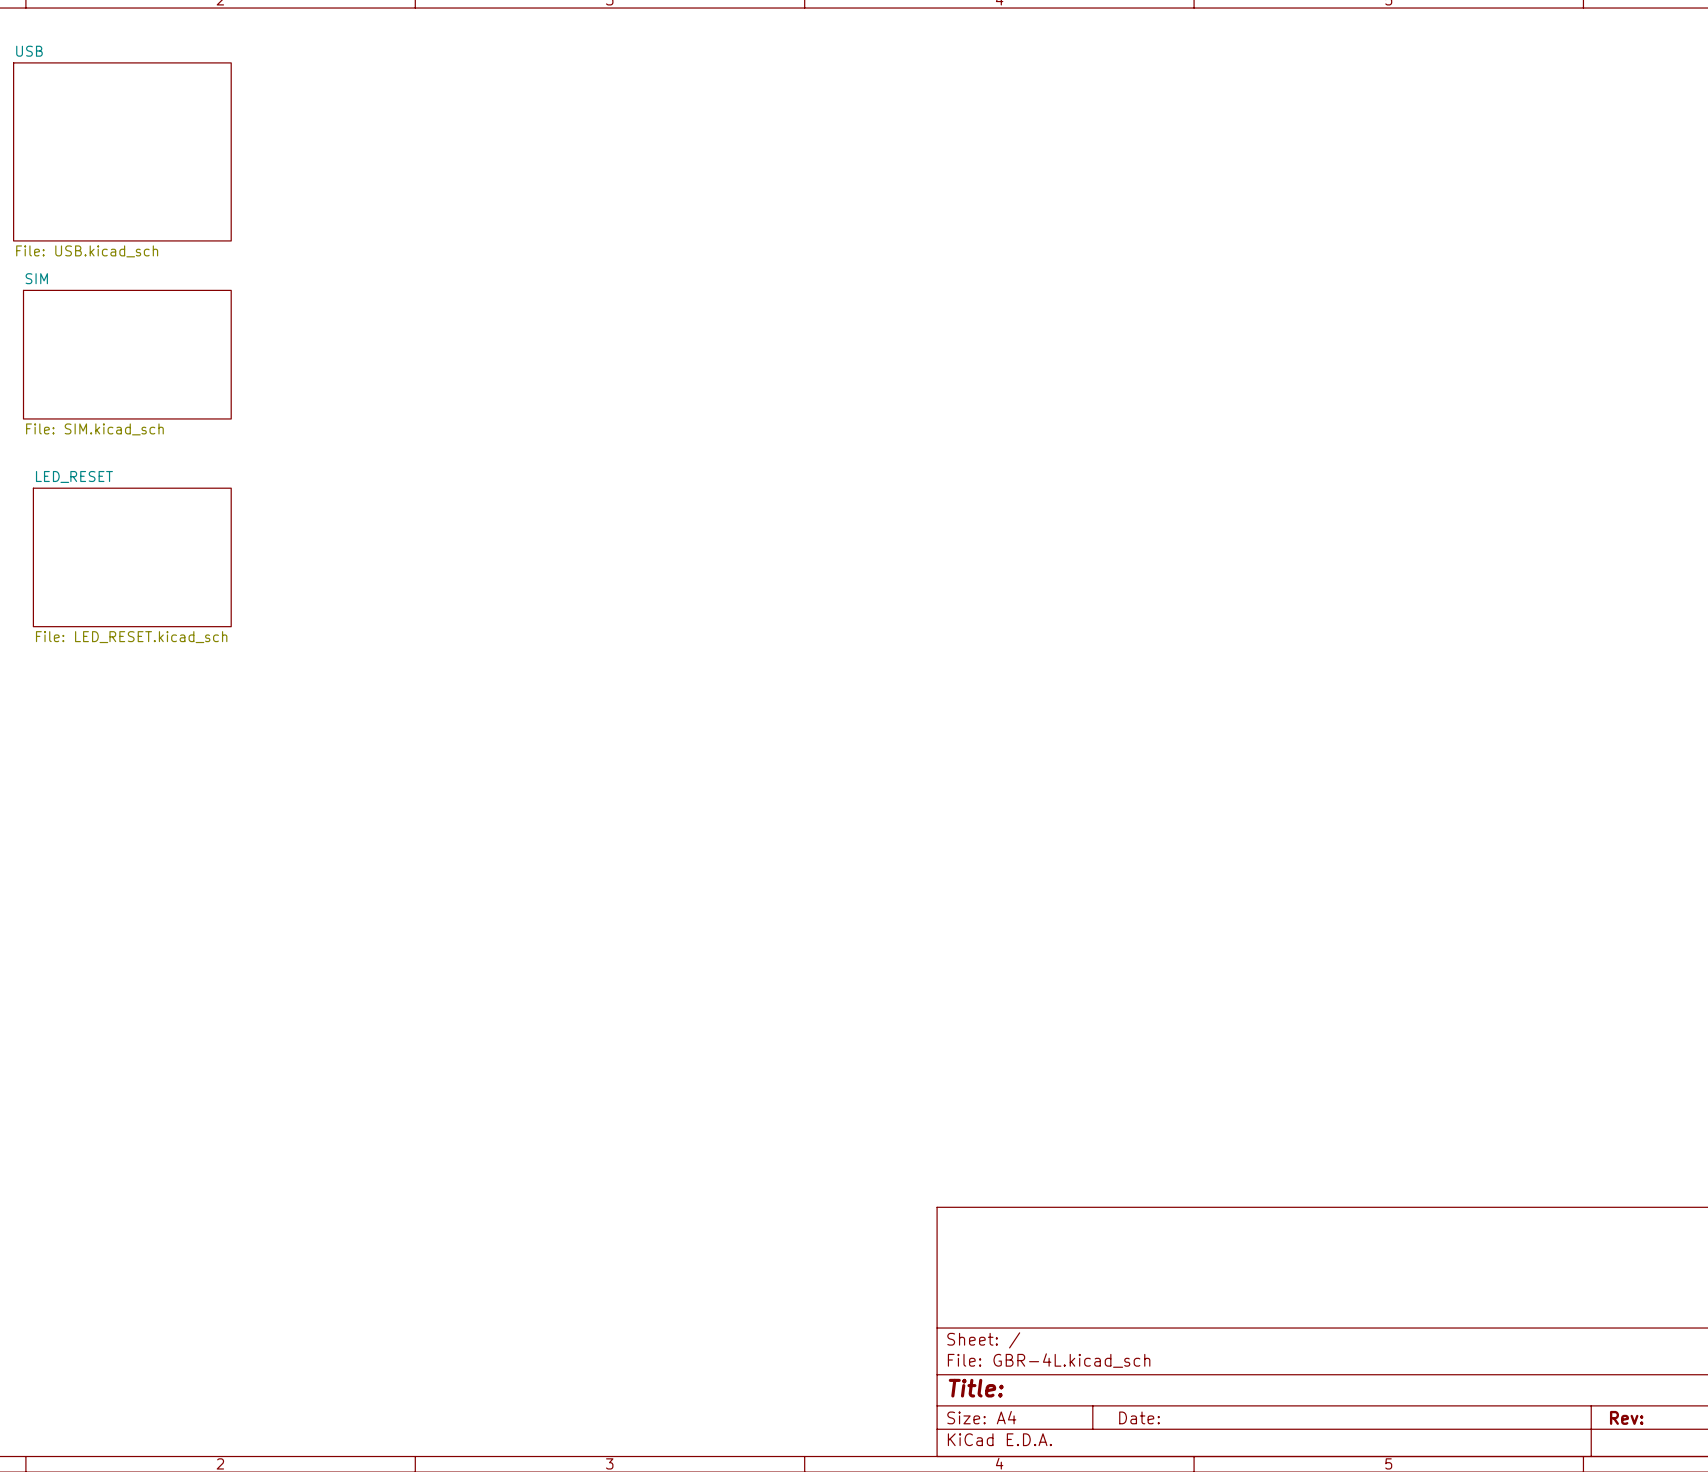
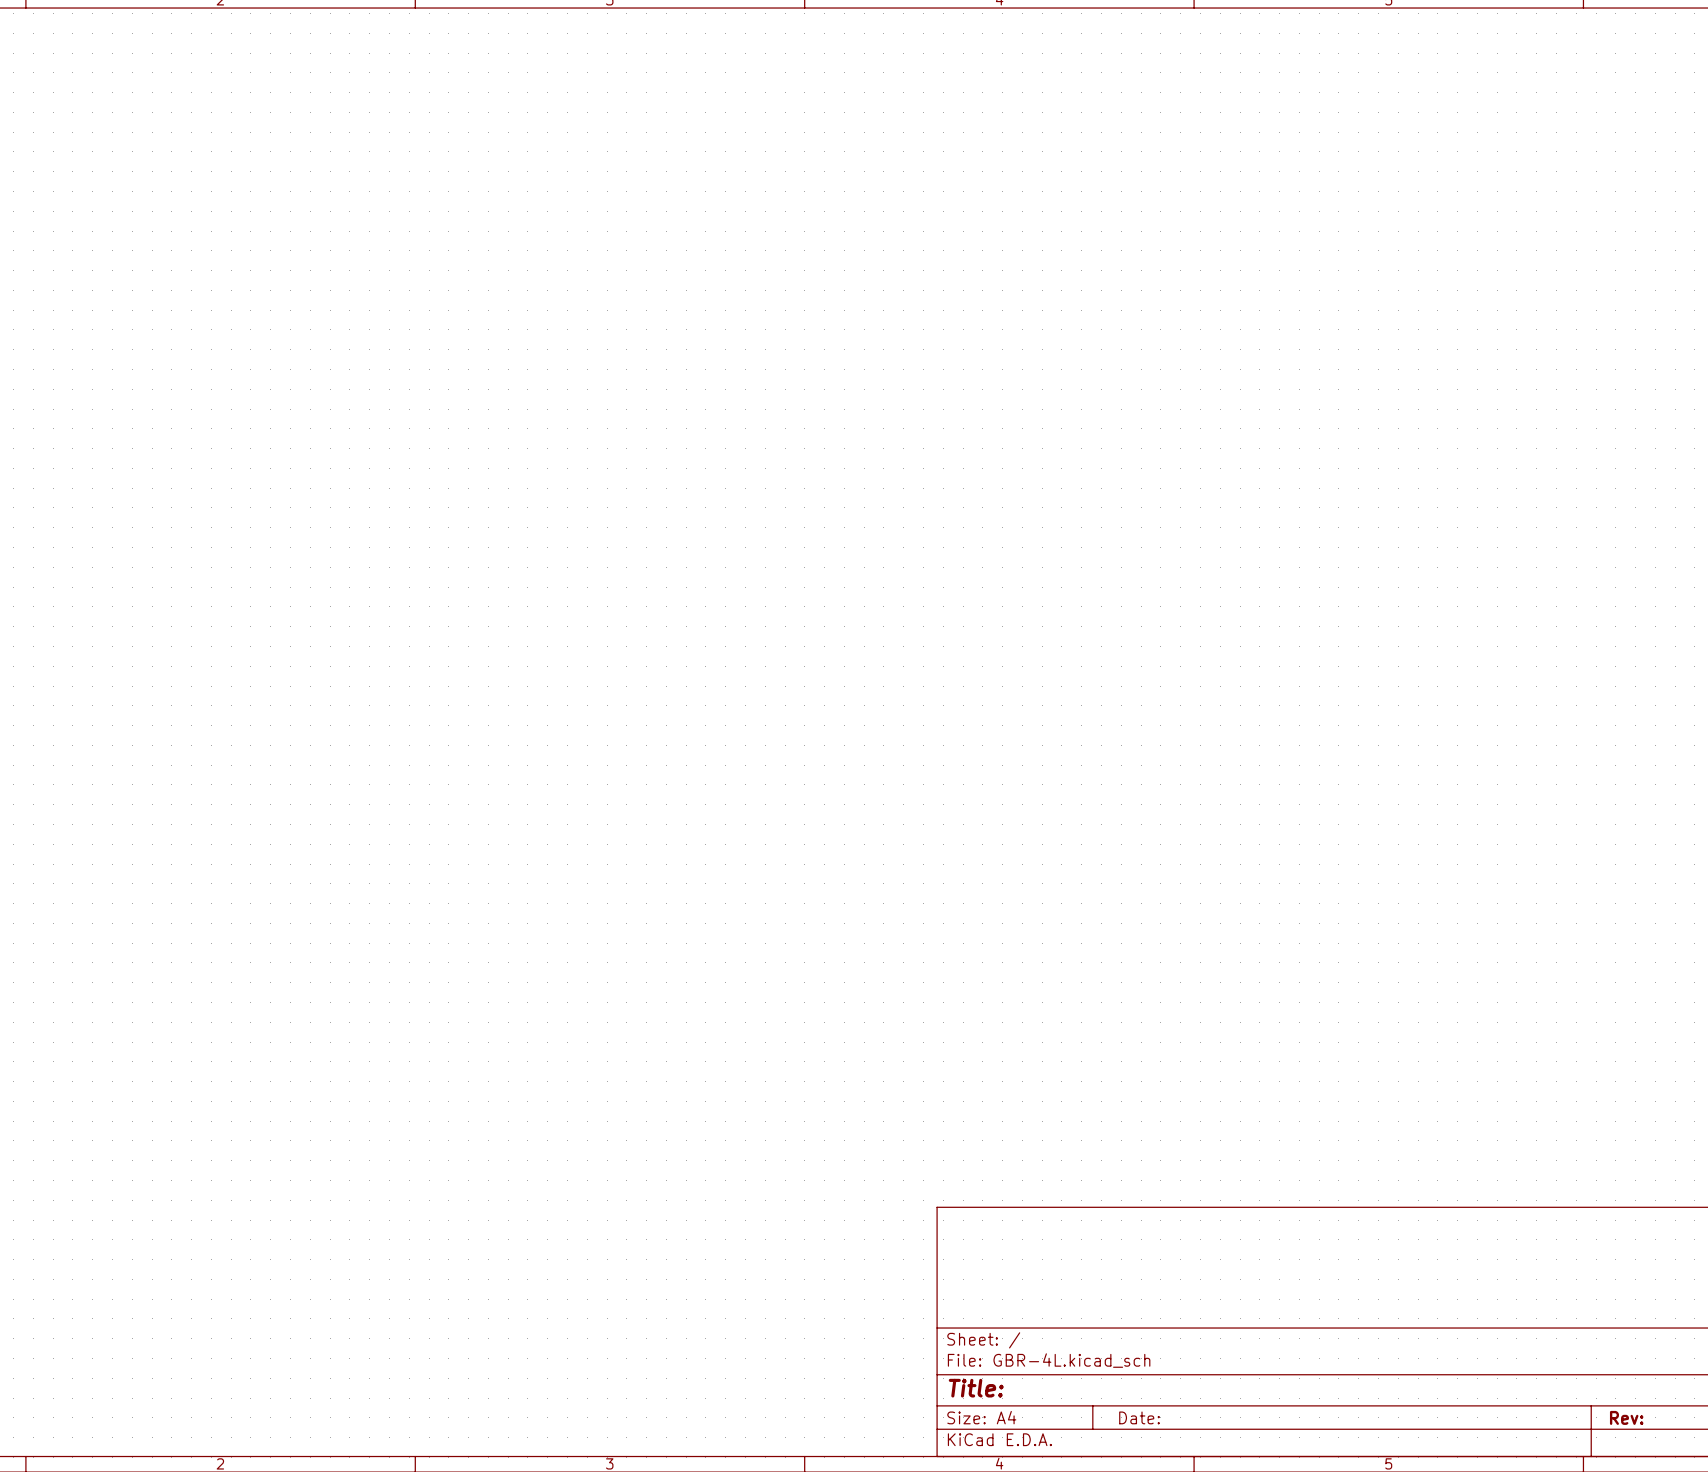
sheet USB: File: USB.kicad_sch (122, 151) -> none
sheet SIM: File: SIM.kicad_sch (127, 354) -> none
sheet LED_RESET: File: LED_RESET.kicad_sch (132, 557) -> none

